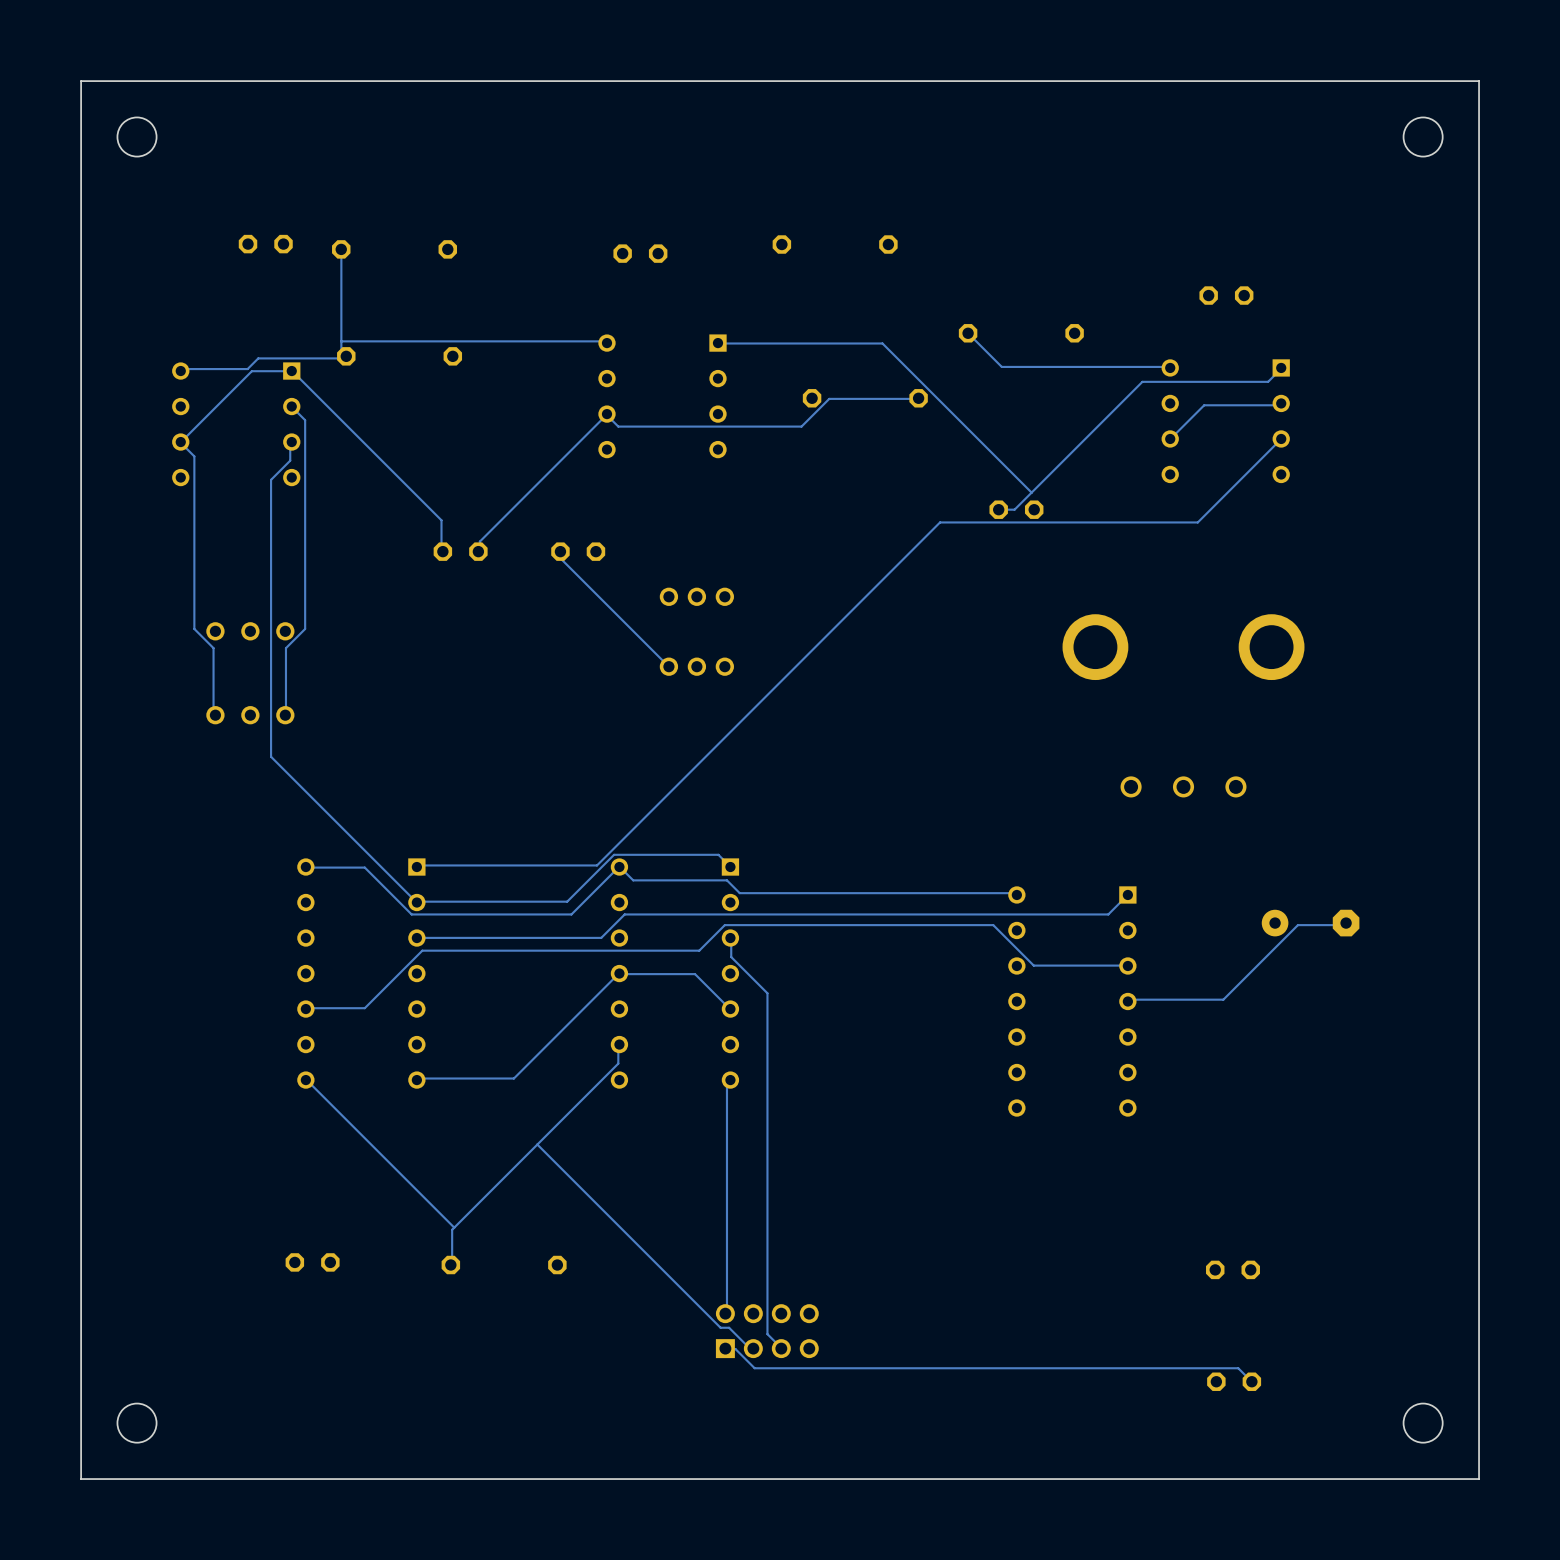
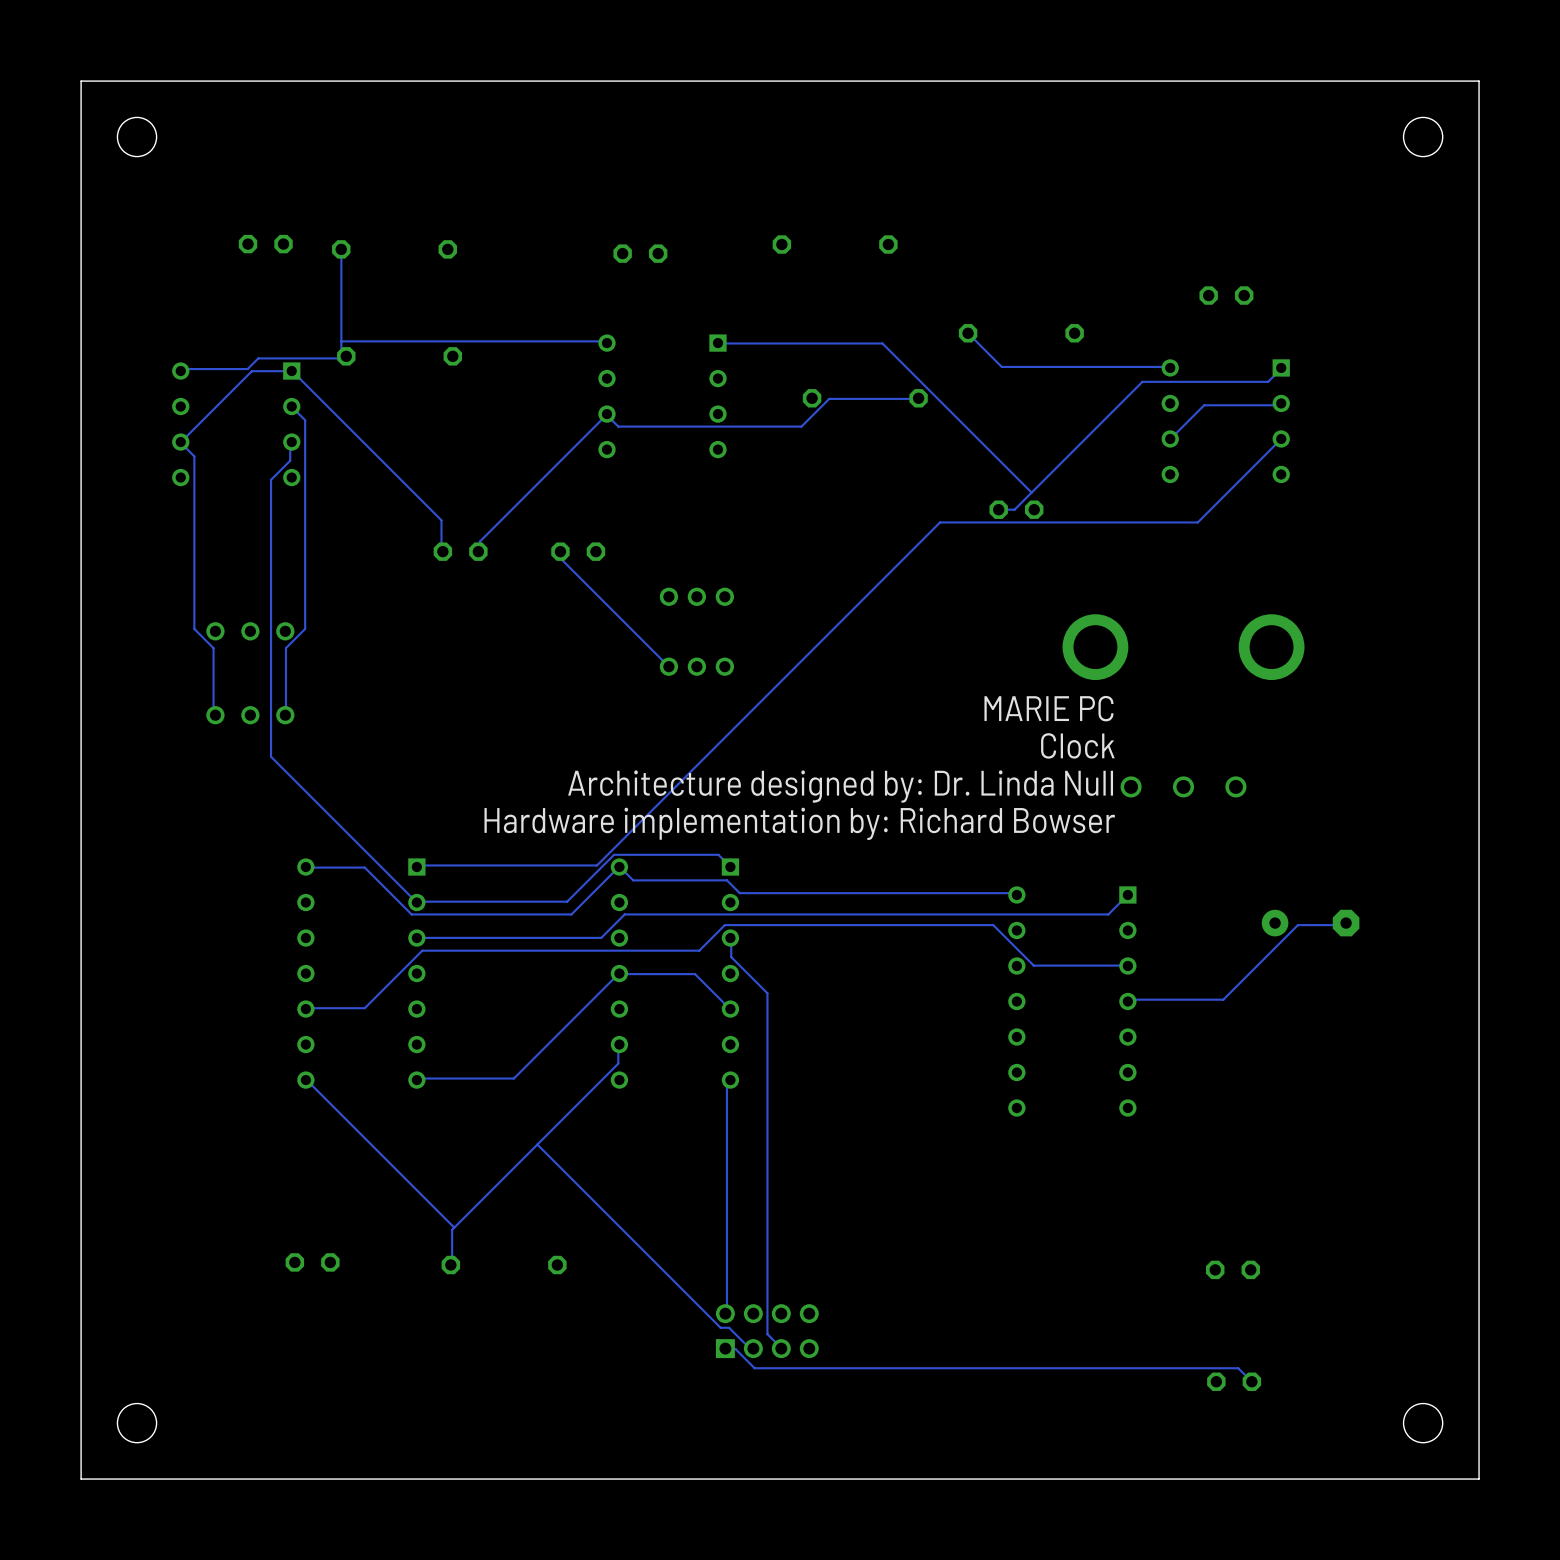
text: none -> MARIE PC (1048, 708)
text: none -> Clock (1077, 745)
text: none -> Architecture designed by: Dr. Linda Null (840, 786)
text: none -> Hardware implementation by: Richard Bowser (799, 823)

